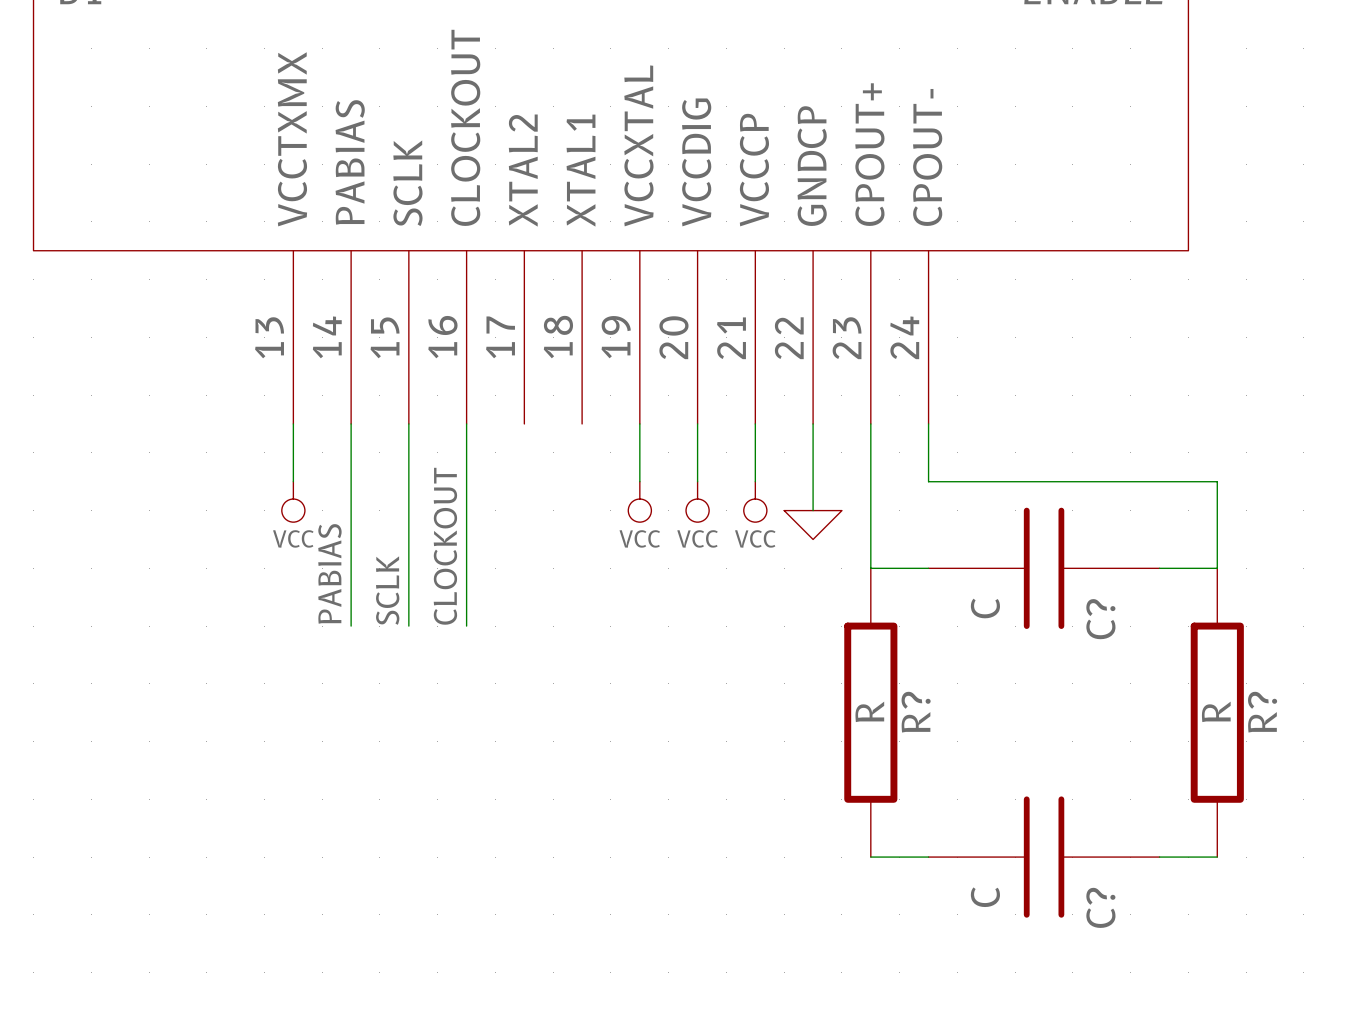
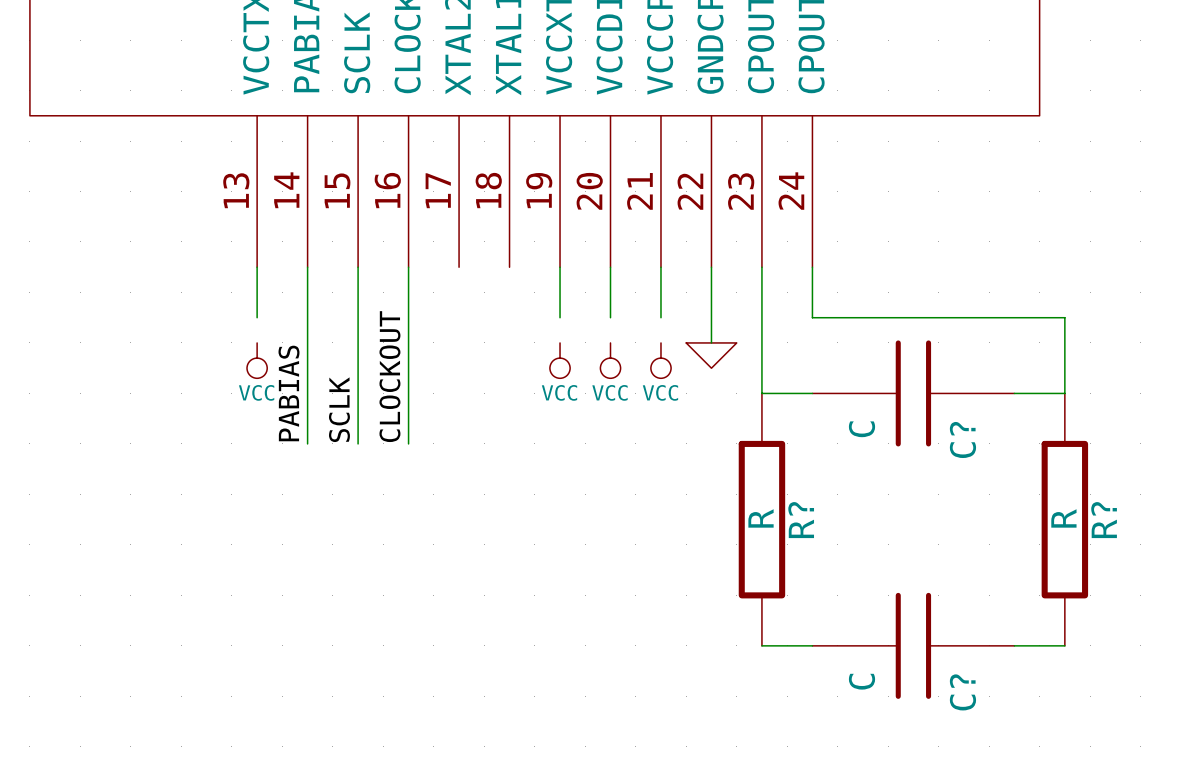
power symbol position: VCC (293, 501) -> VCC (257, 360)
power symbol position: VCC (639, 501) -> VCC (560, 360)
power symbol position: VCC (697, 501) -> VCC (610, 360)
power symbol position: VCC (755, 501) -> VCC (660, 360)

